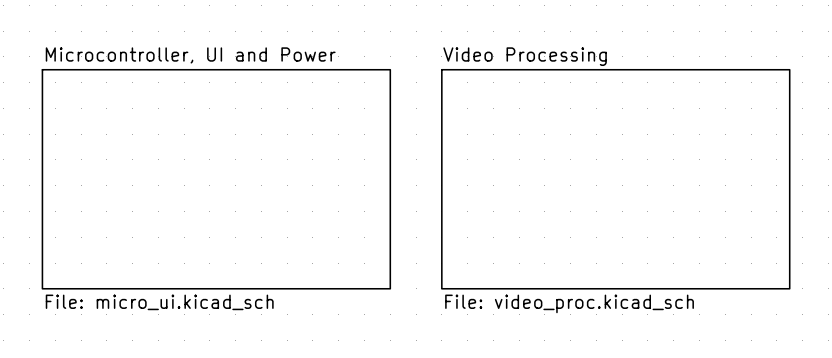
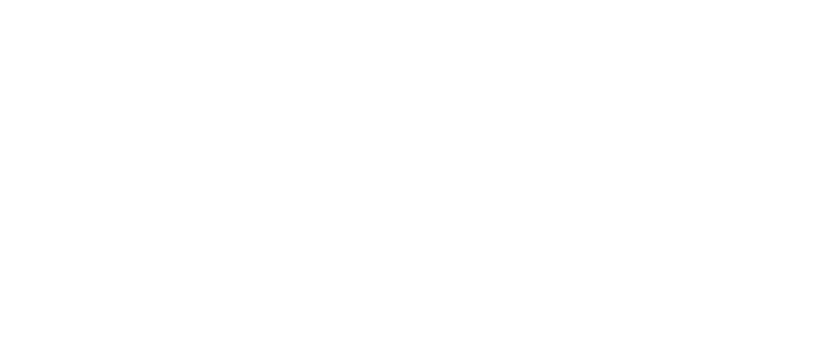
sheet Microcontroller, UI and Power: File: micro_ui.kicad_sch (216, 179) -> none
sheet Video Processing: File: video_proc.kicad_sch (615, 179) -> none

